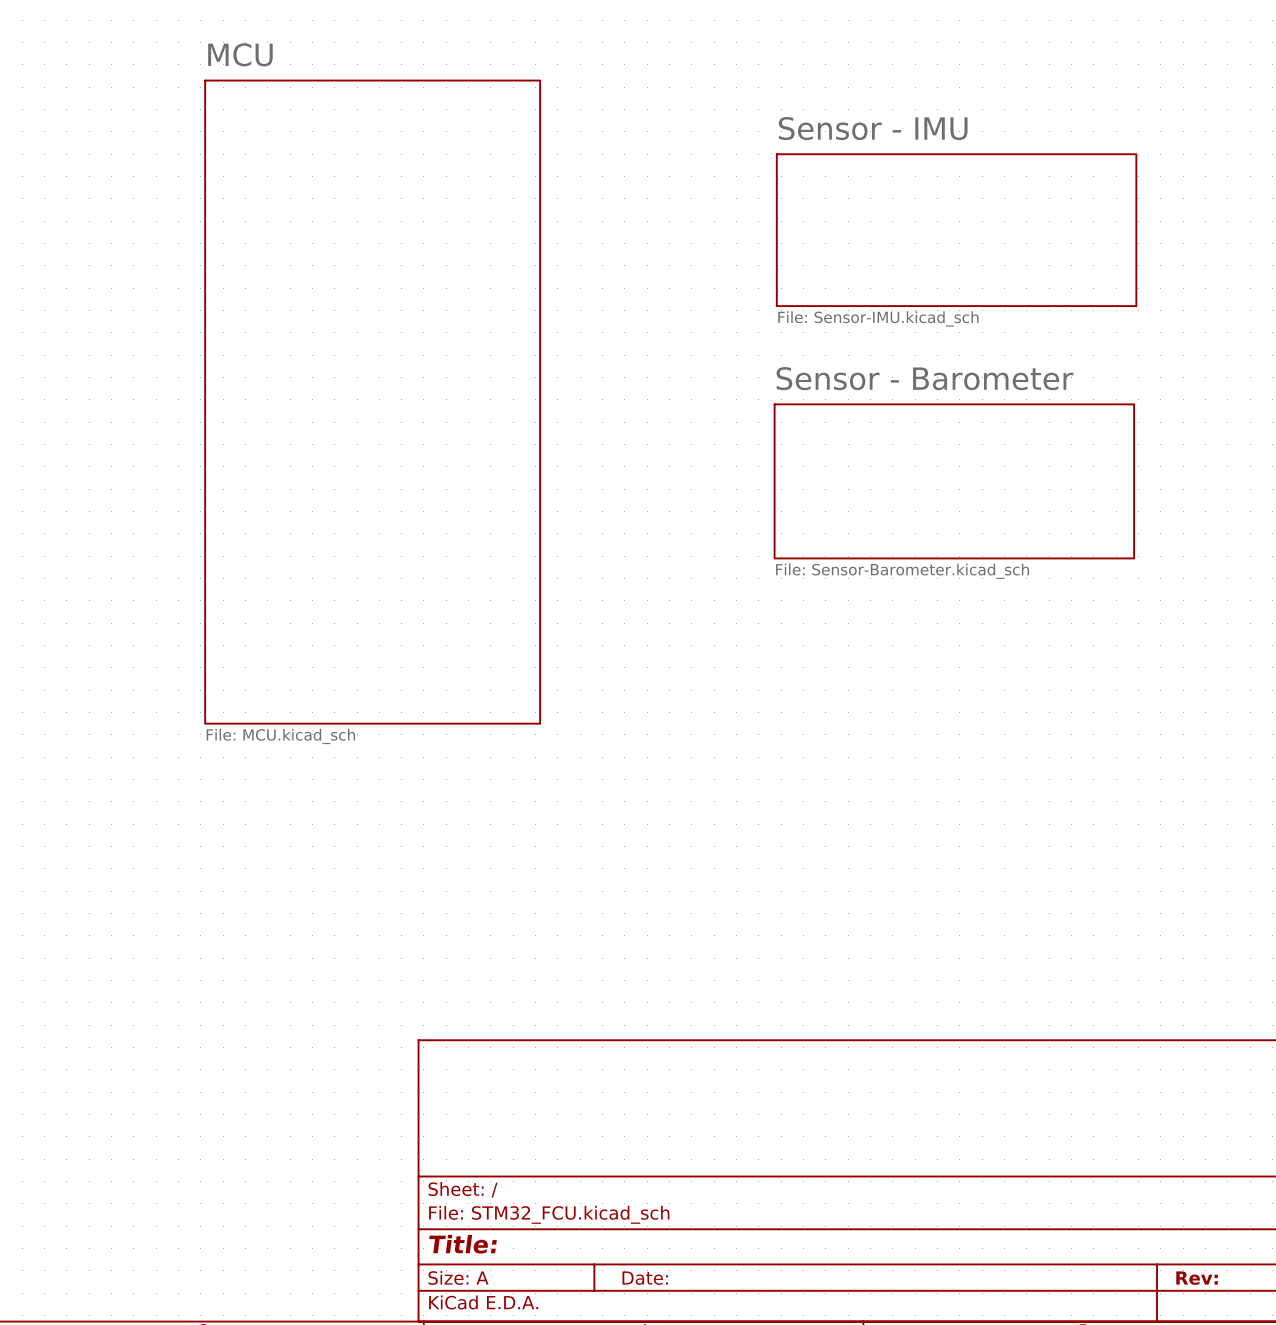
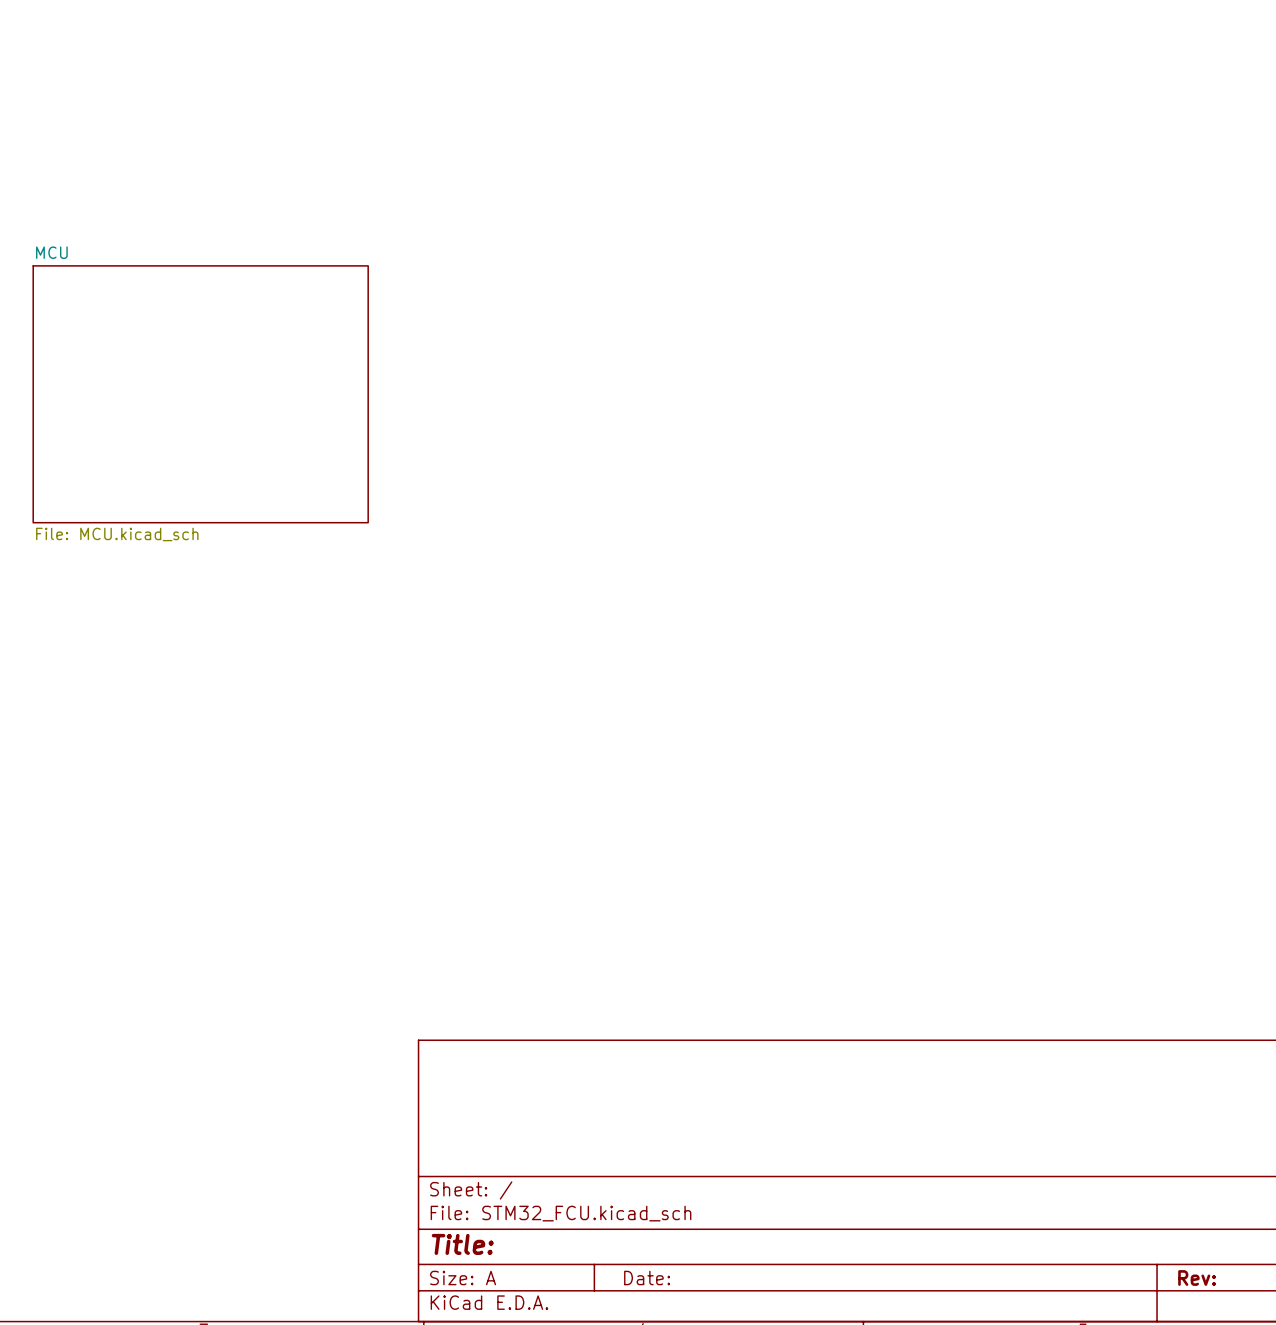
sheet Sensor - IMU: File: Sensor-IMU.kicad_sch (956, 230) -> none
sheet MCU: none -> File: MCU.kicad_sch (200, 394)
sheet MCU: File: MCU.kicad_sch (372, 402) -> none
sheet Sensor - Barometer: File: Sensor-Barometer.kicad_sch (954, 481) -> none

